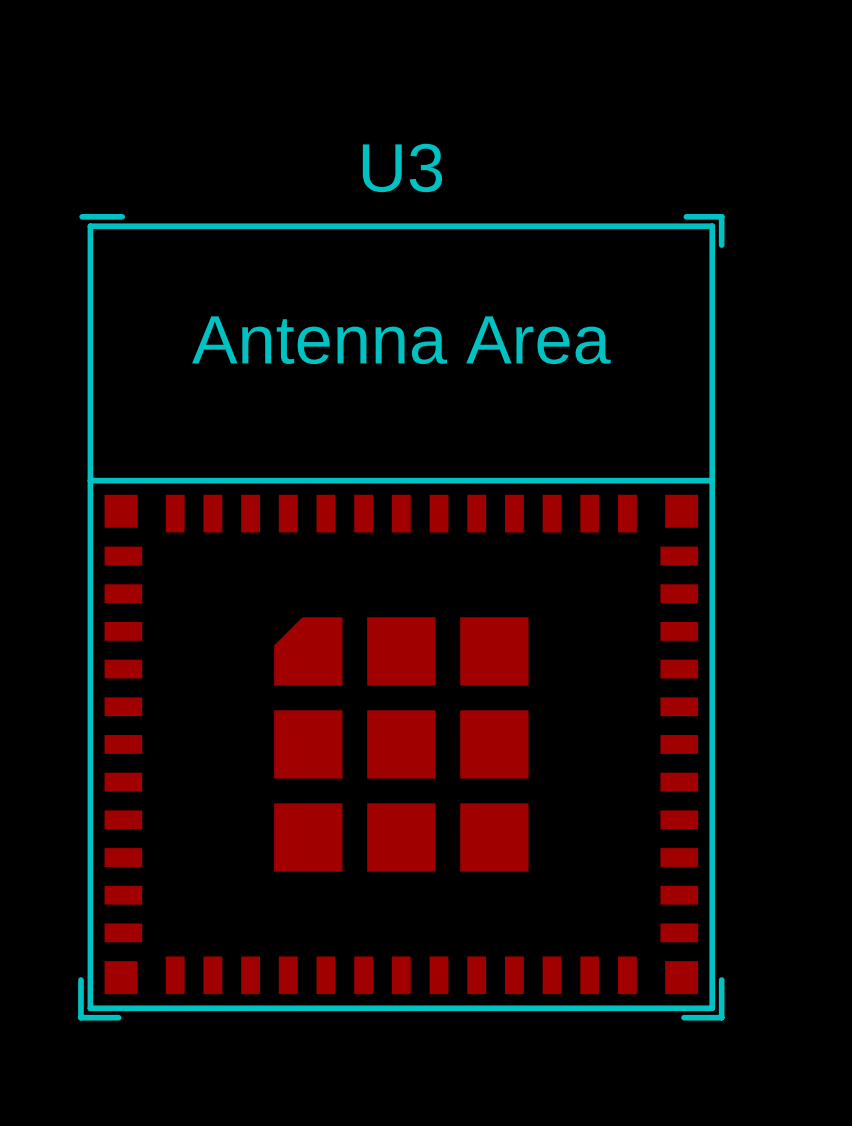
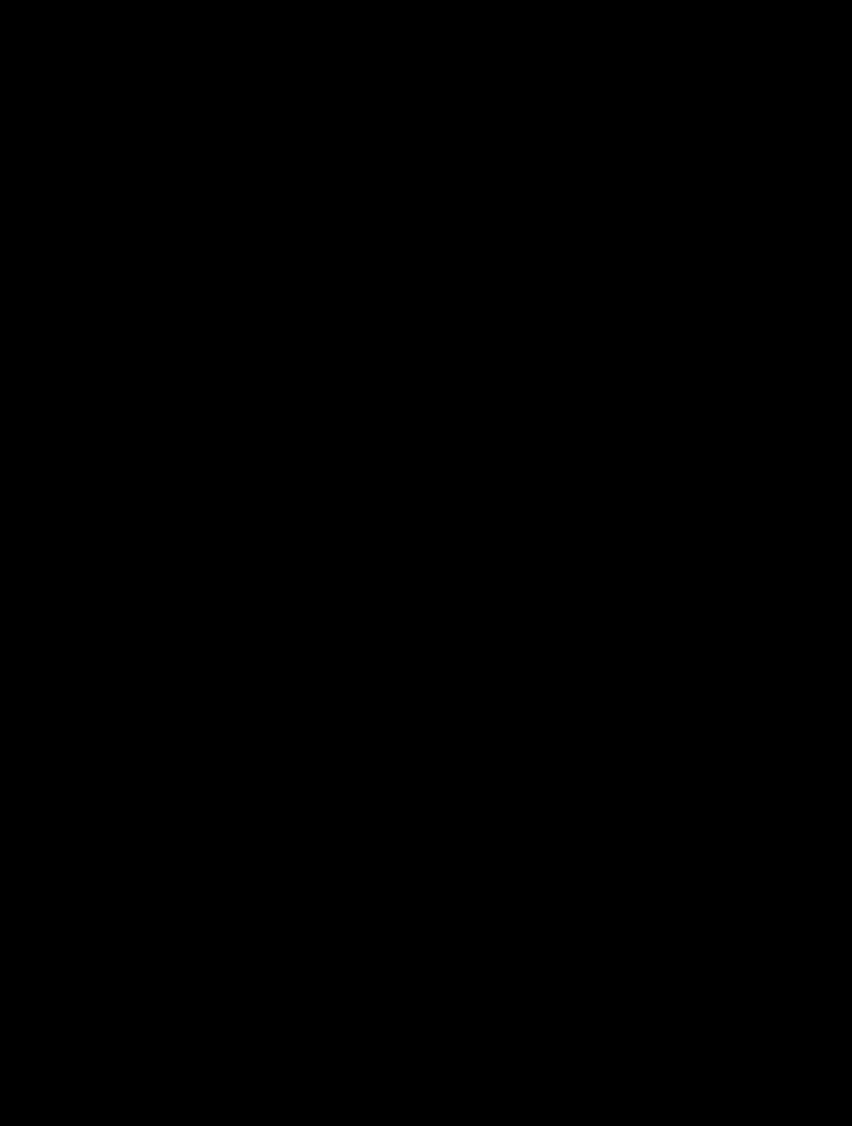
U3: (401, 617) -> none

